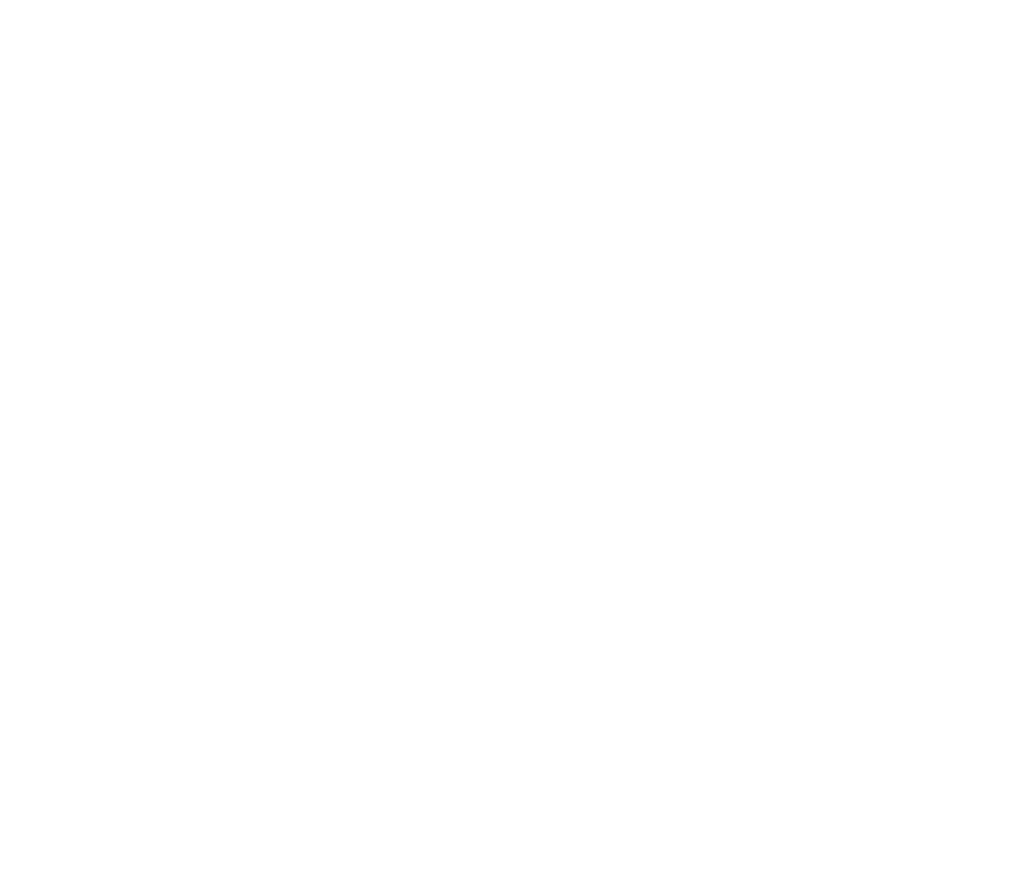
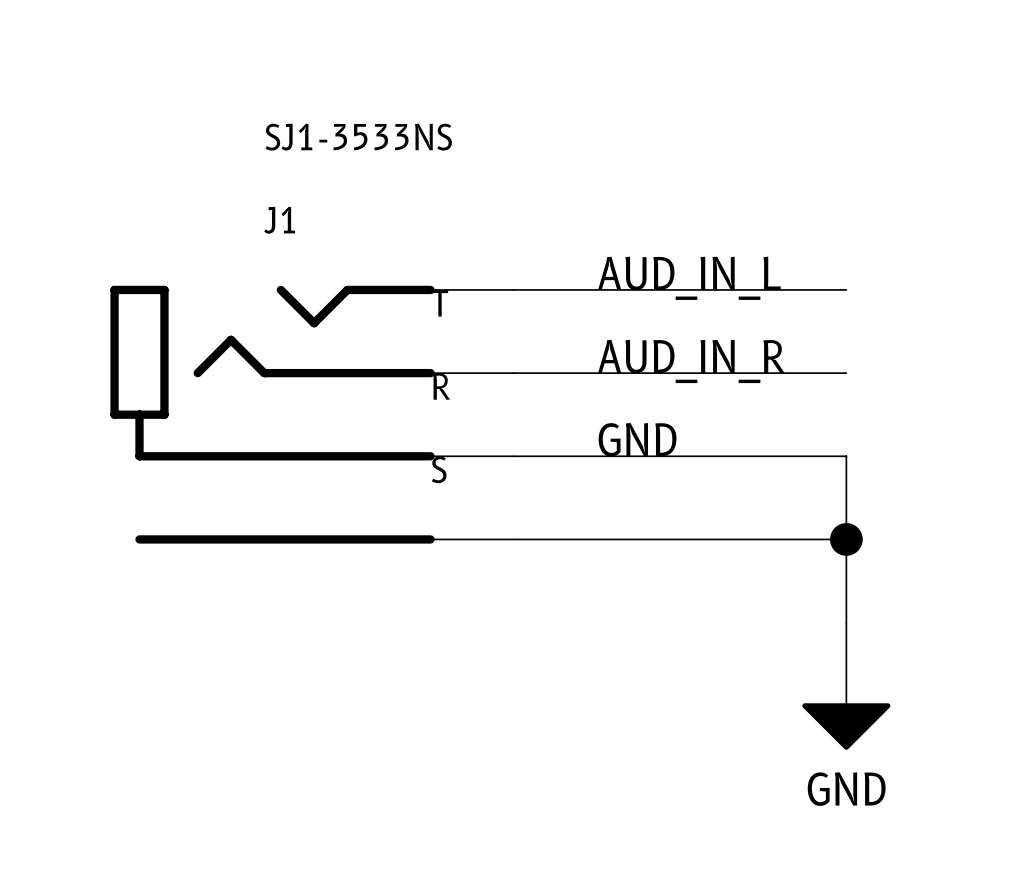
label: none -> AUD_IN_L (689, 278)
wire: none -> (513, 289) (846, 289)
label: none -> AUD_IN_R (691, 361)
wire: none -> (513, 373) (846, 373)
J1: none -> SJ1-3533NS (312, 414)
label: none -> GND (637, 439)
wire: none -> (513, 456) (846, 456) (846, 622)
wire: none -> (513, 539) (846, 539)
junction: none -> (846, 539)
power symbol: none -> GND (846, 686)

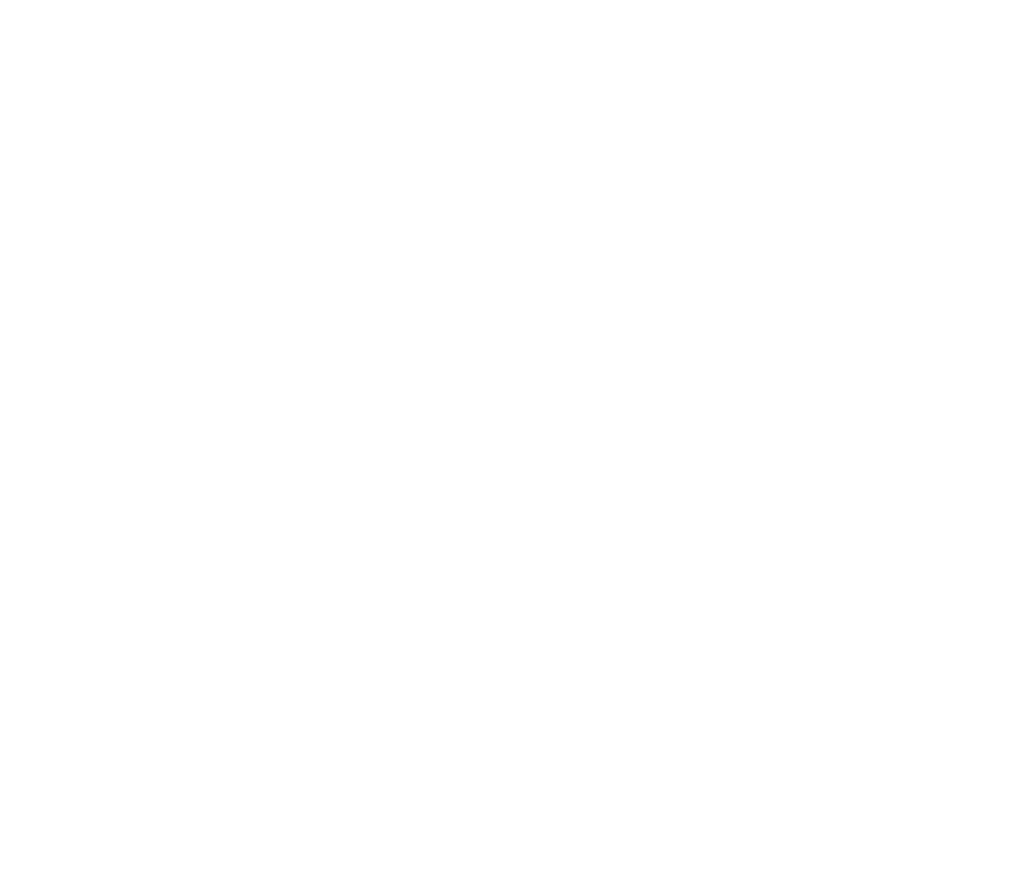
label: AUD_IN_L (689, 278) -> none
wire: (513, 289) (846, 289) -> none
label: AUD_IN_R (691, 361) -> none
wire: (513, 373) (846, 373) -> none
J1: SJ1-3533NS (312, 414) -> none
label: GND (637, 439) -> none
wire: (513, 456) (846, 456) (846, 622) -> none
wire: (513, 539) (846, 539) -> none
junction: (846, 539) -> none
power symbol: GND (846, 686) -> none

